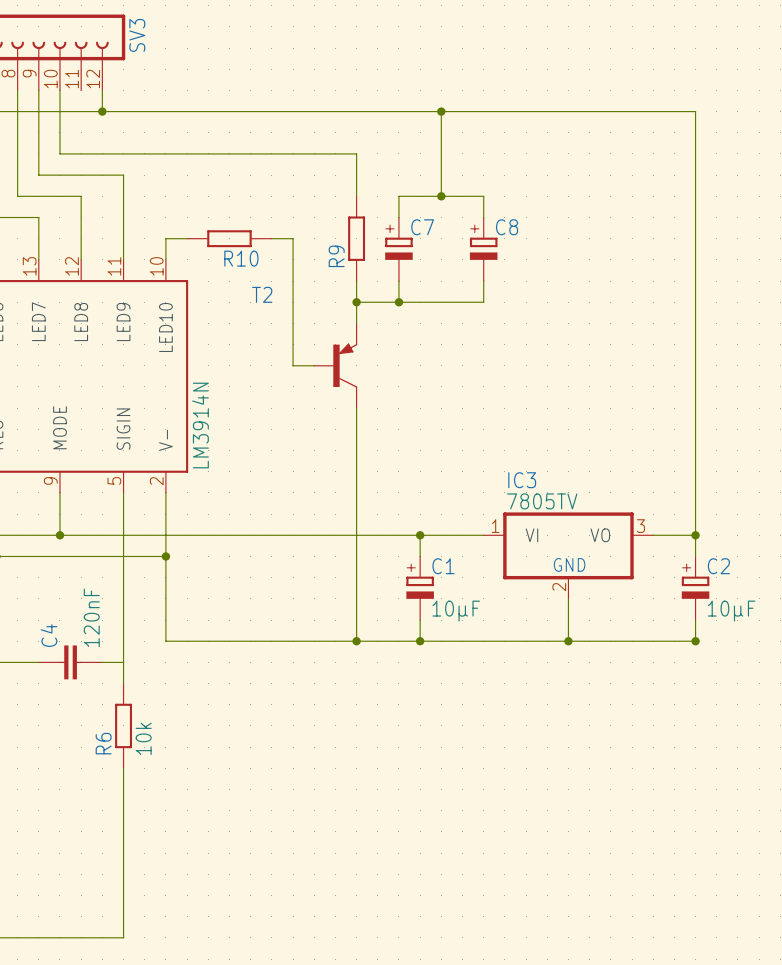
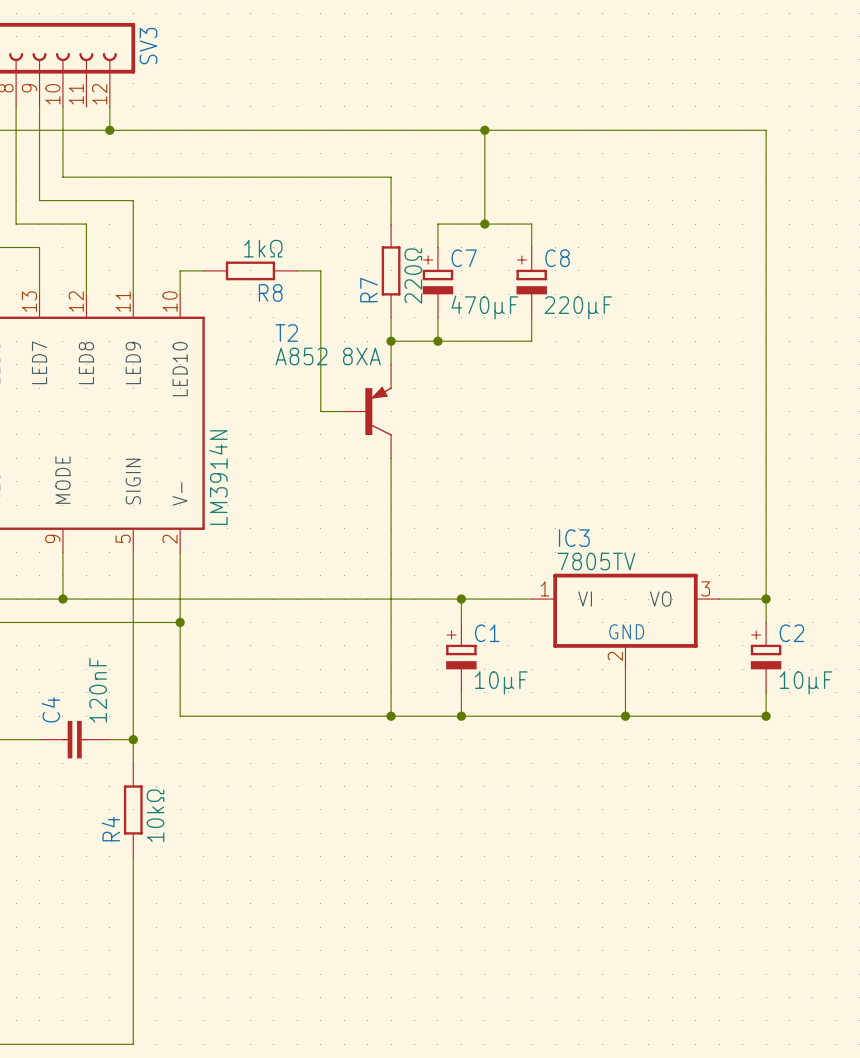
R10 value: none -> 1kΩ (263, 248)
R9 value: none -> 220Ω (413, 276)
R9 name: R9 (336, 256) -> R7 (369, 290)
R10 name: R10 (241, 258) -> R8 (270, 292)
C7 value: none -> 470µF (484, 307)
C8 value: none -> 220µF (578, 307)
T2 value: none -> A852 8XA (328, 356)
junction: none -> (133, 739)
R6 value: 10k (143, 738) -> 10kΩ (155, 815)
R6 name: R6 (103, 743) -> R4 (110, 829)

